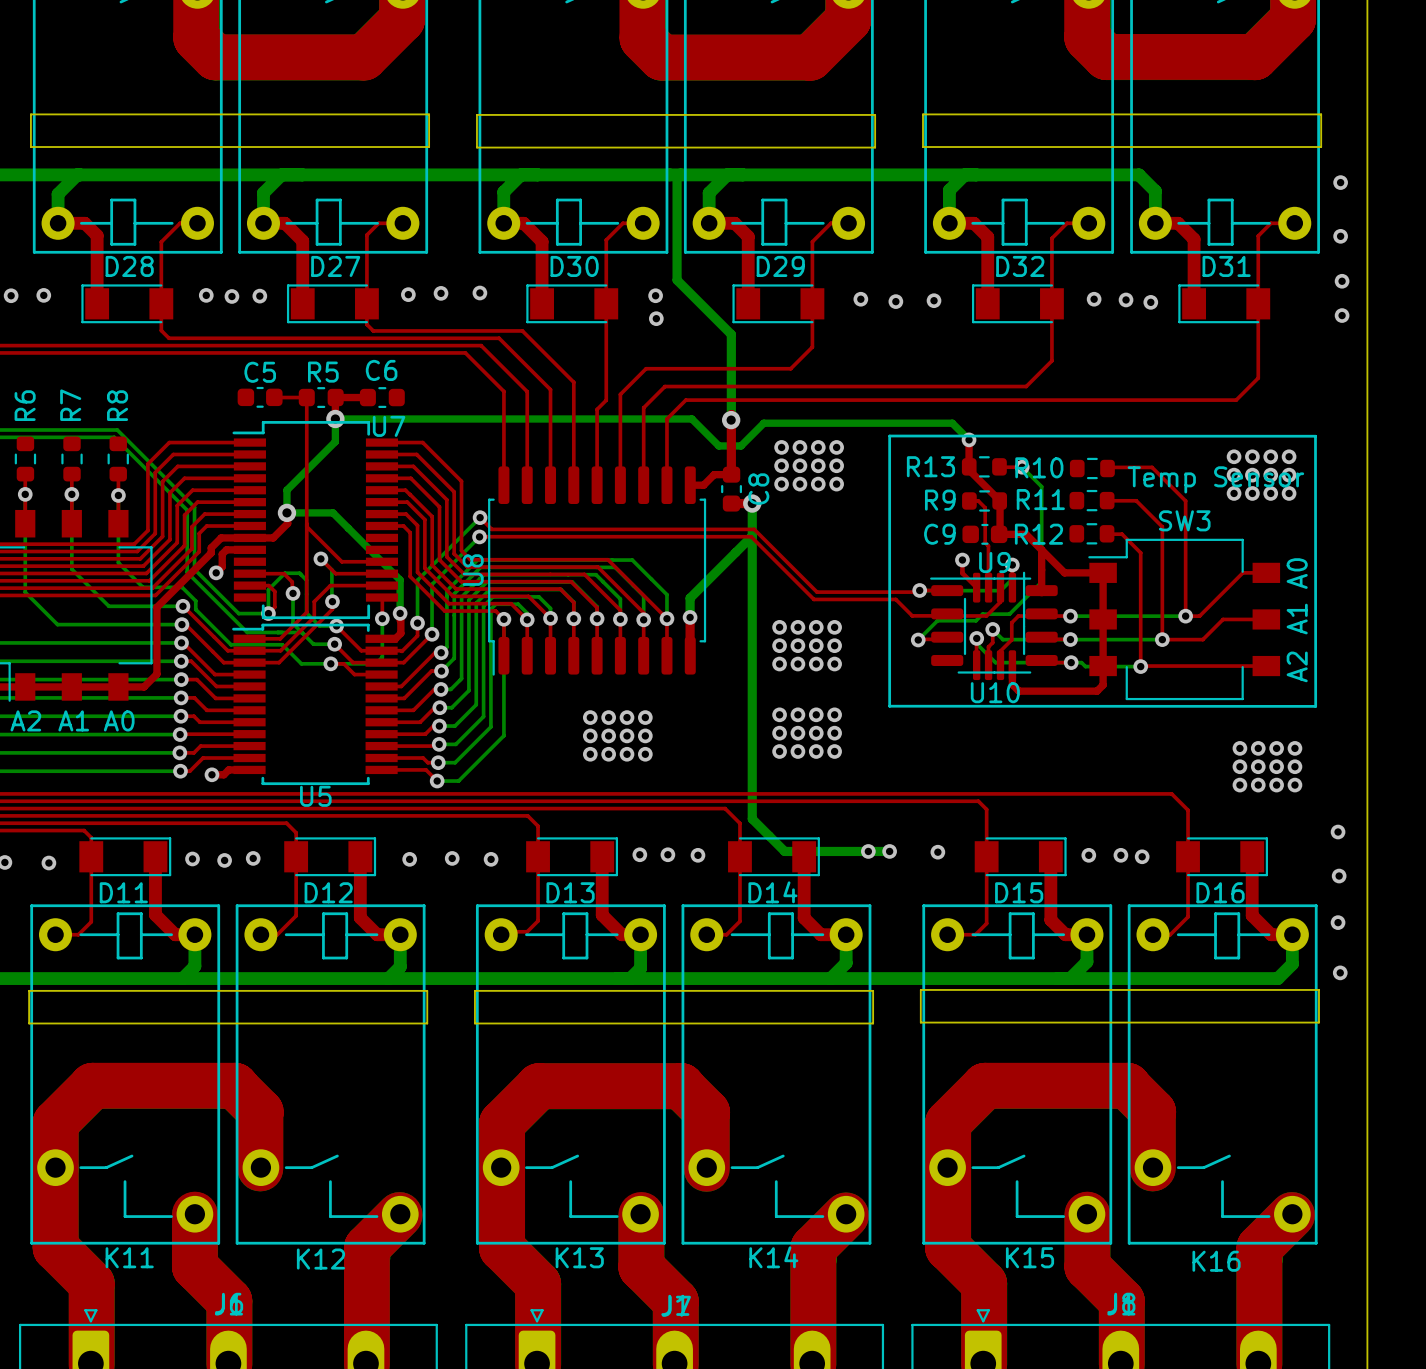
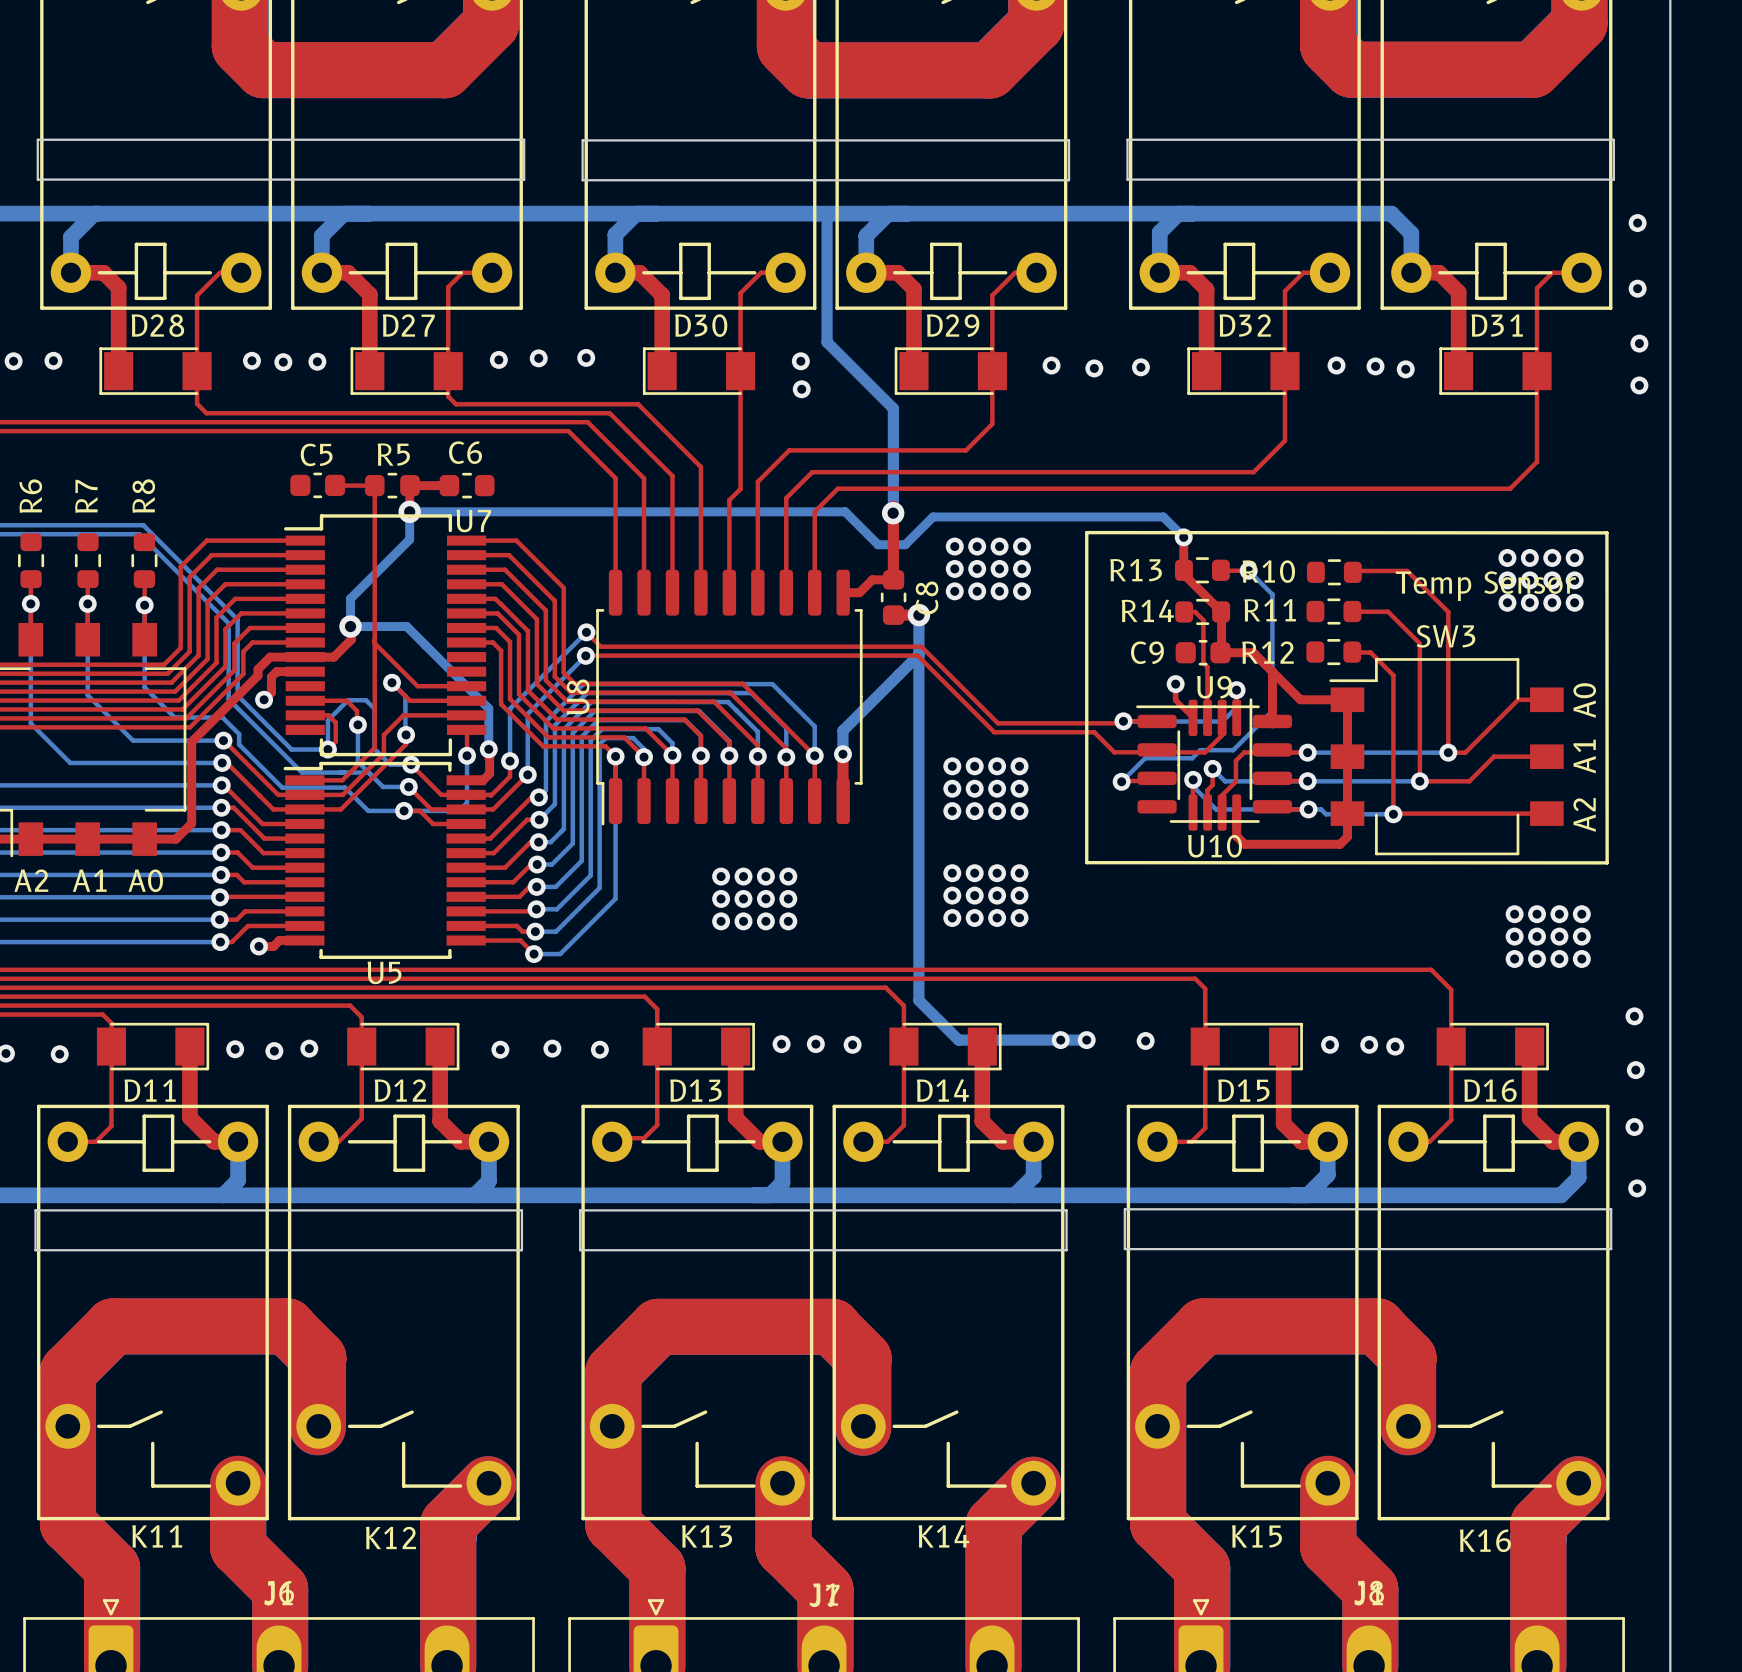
R9 name: R9 (940, 500) -> R14 (1147, 610)

